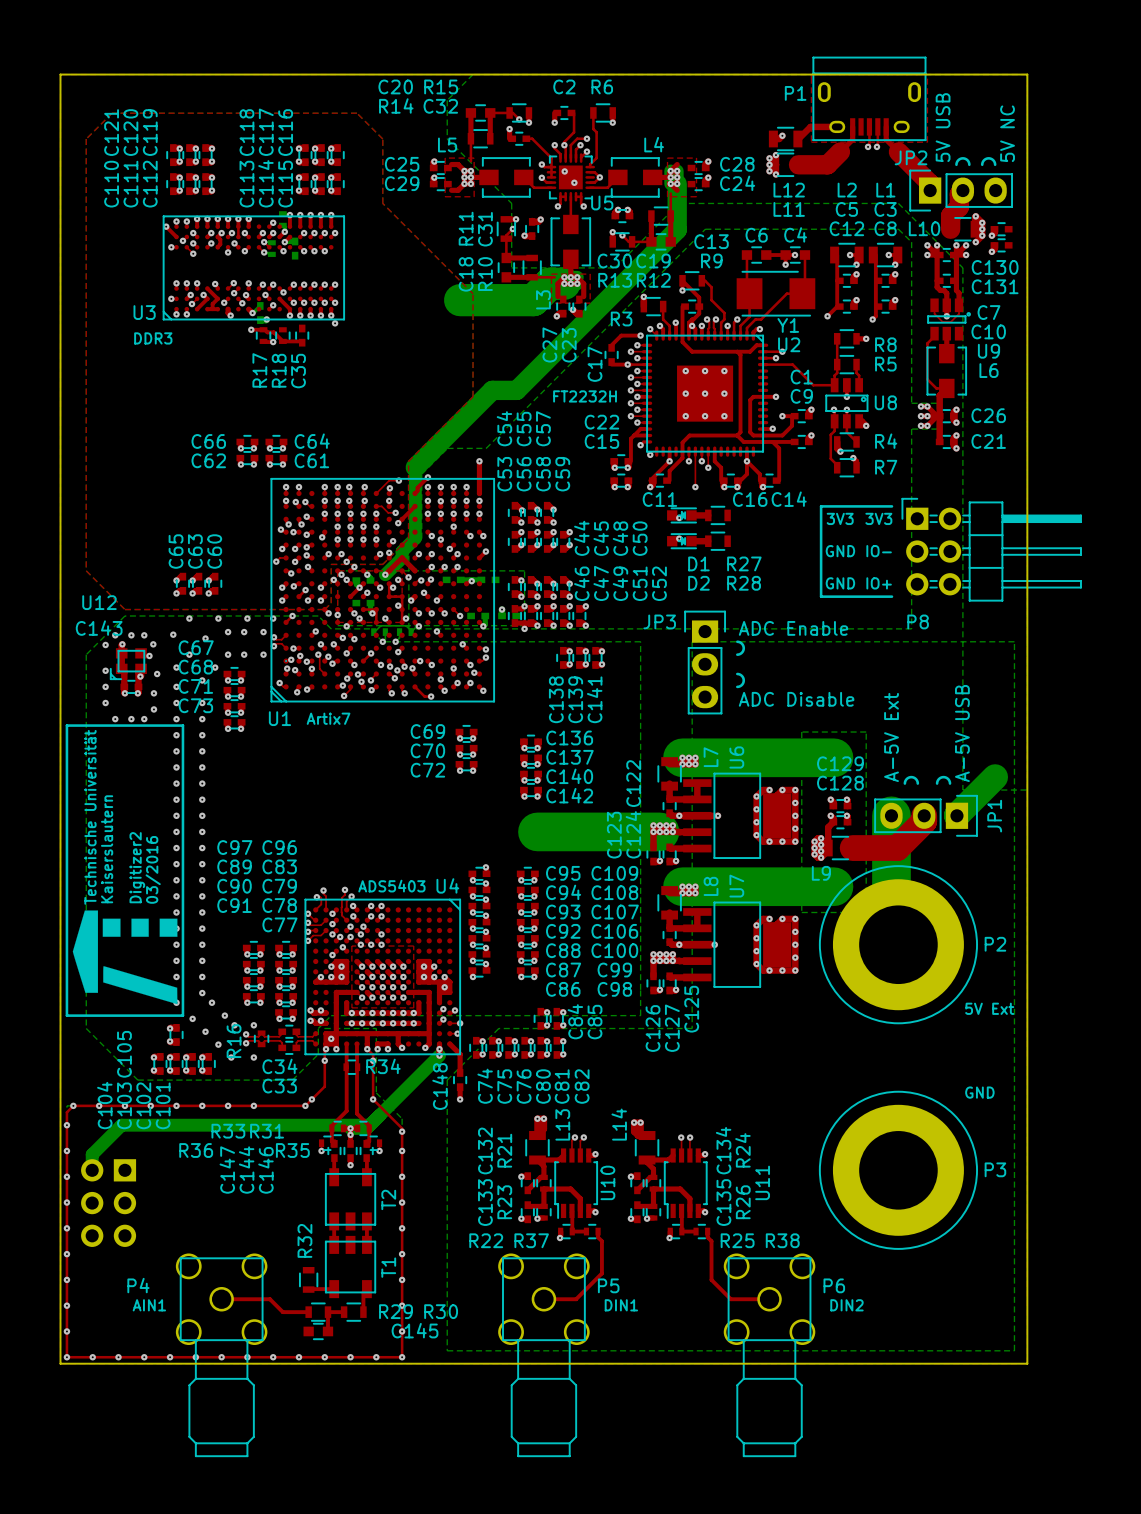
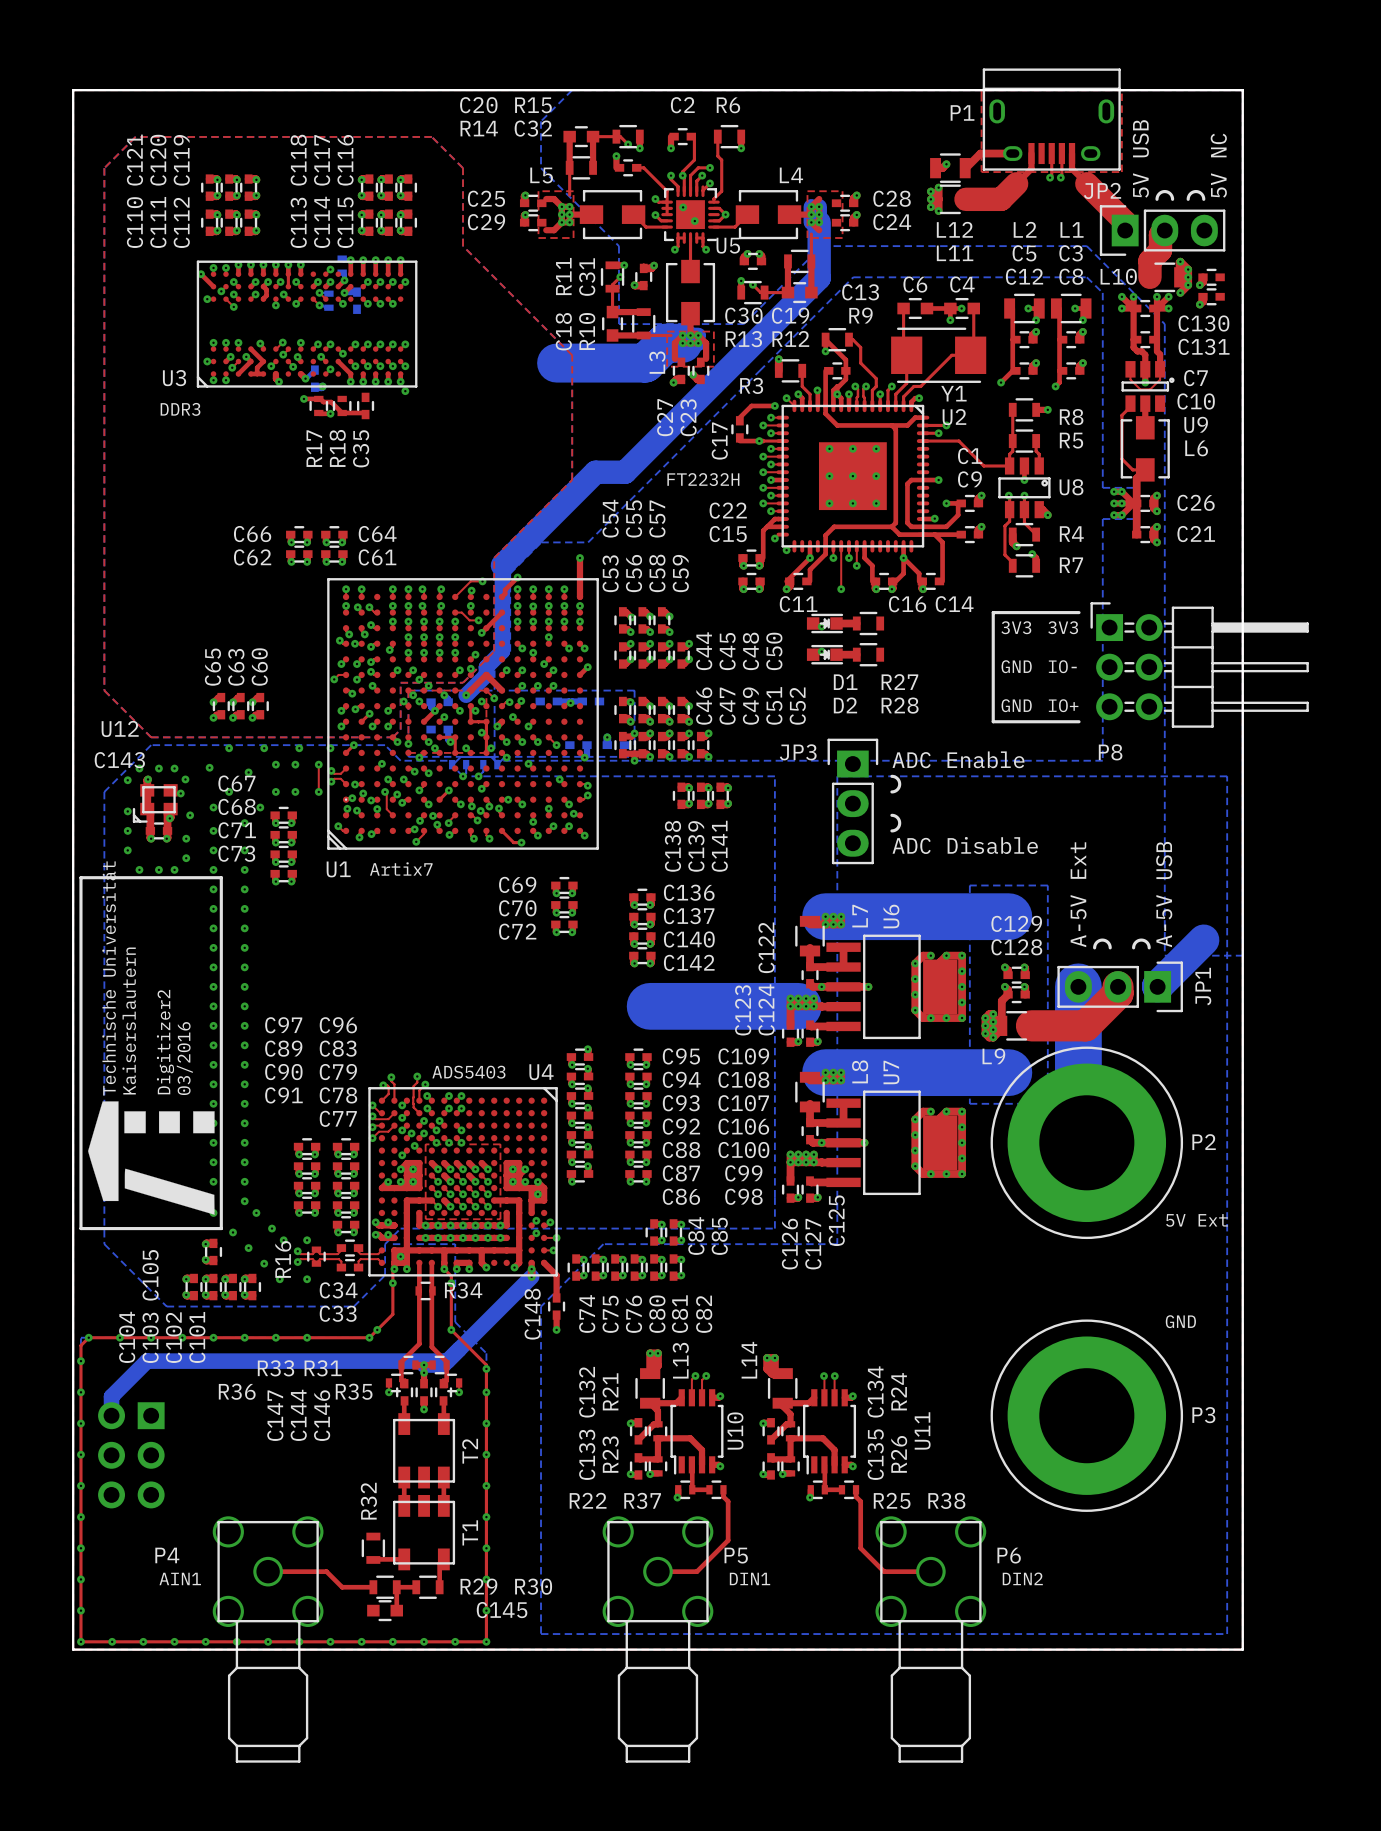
top track: none -> (318, 764) (318, 791)

